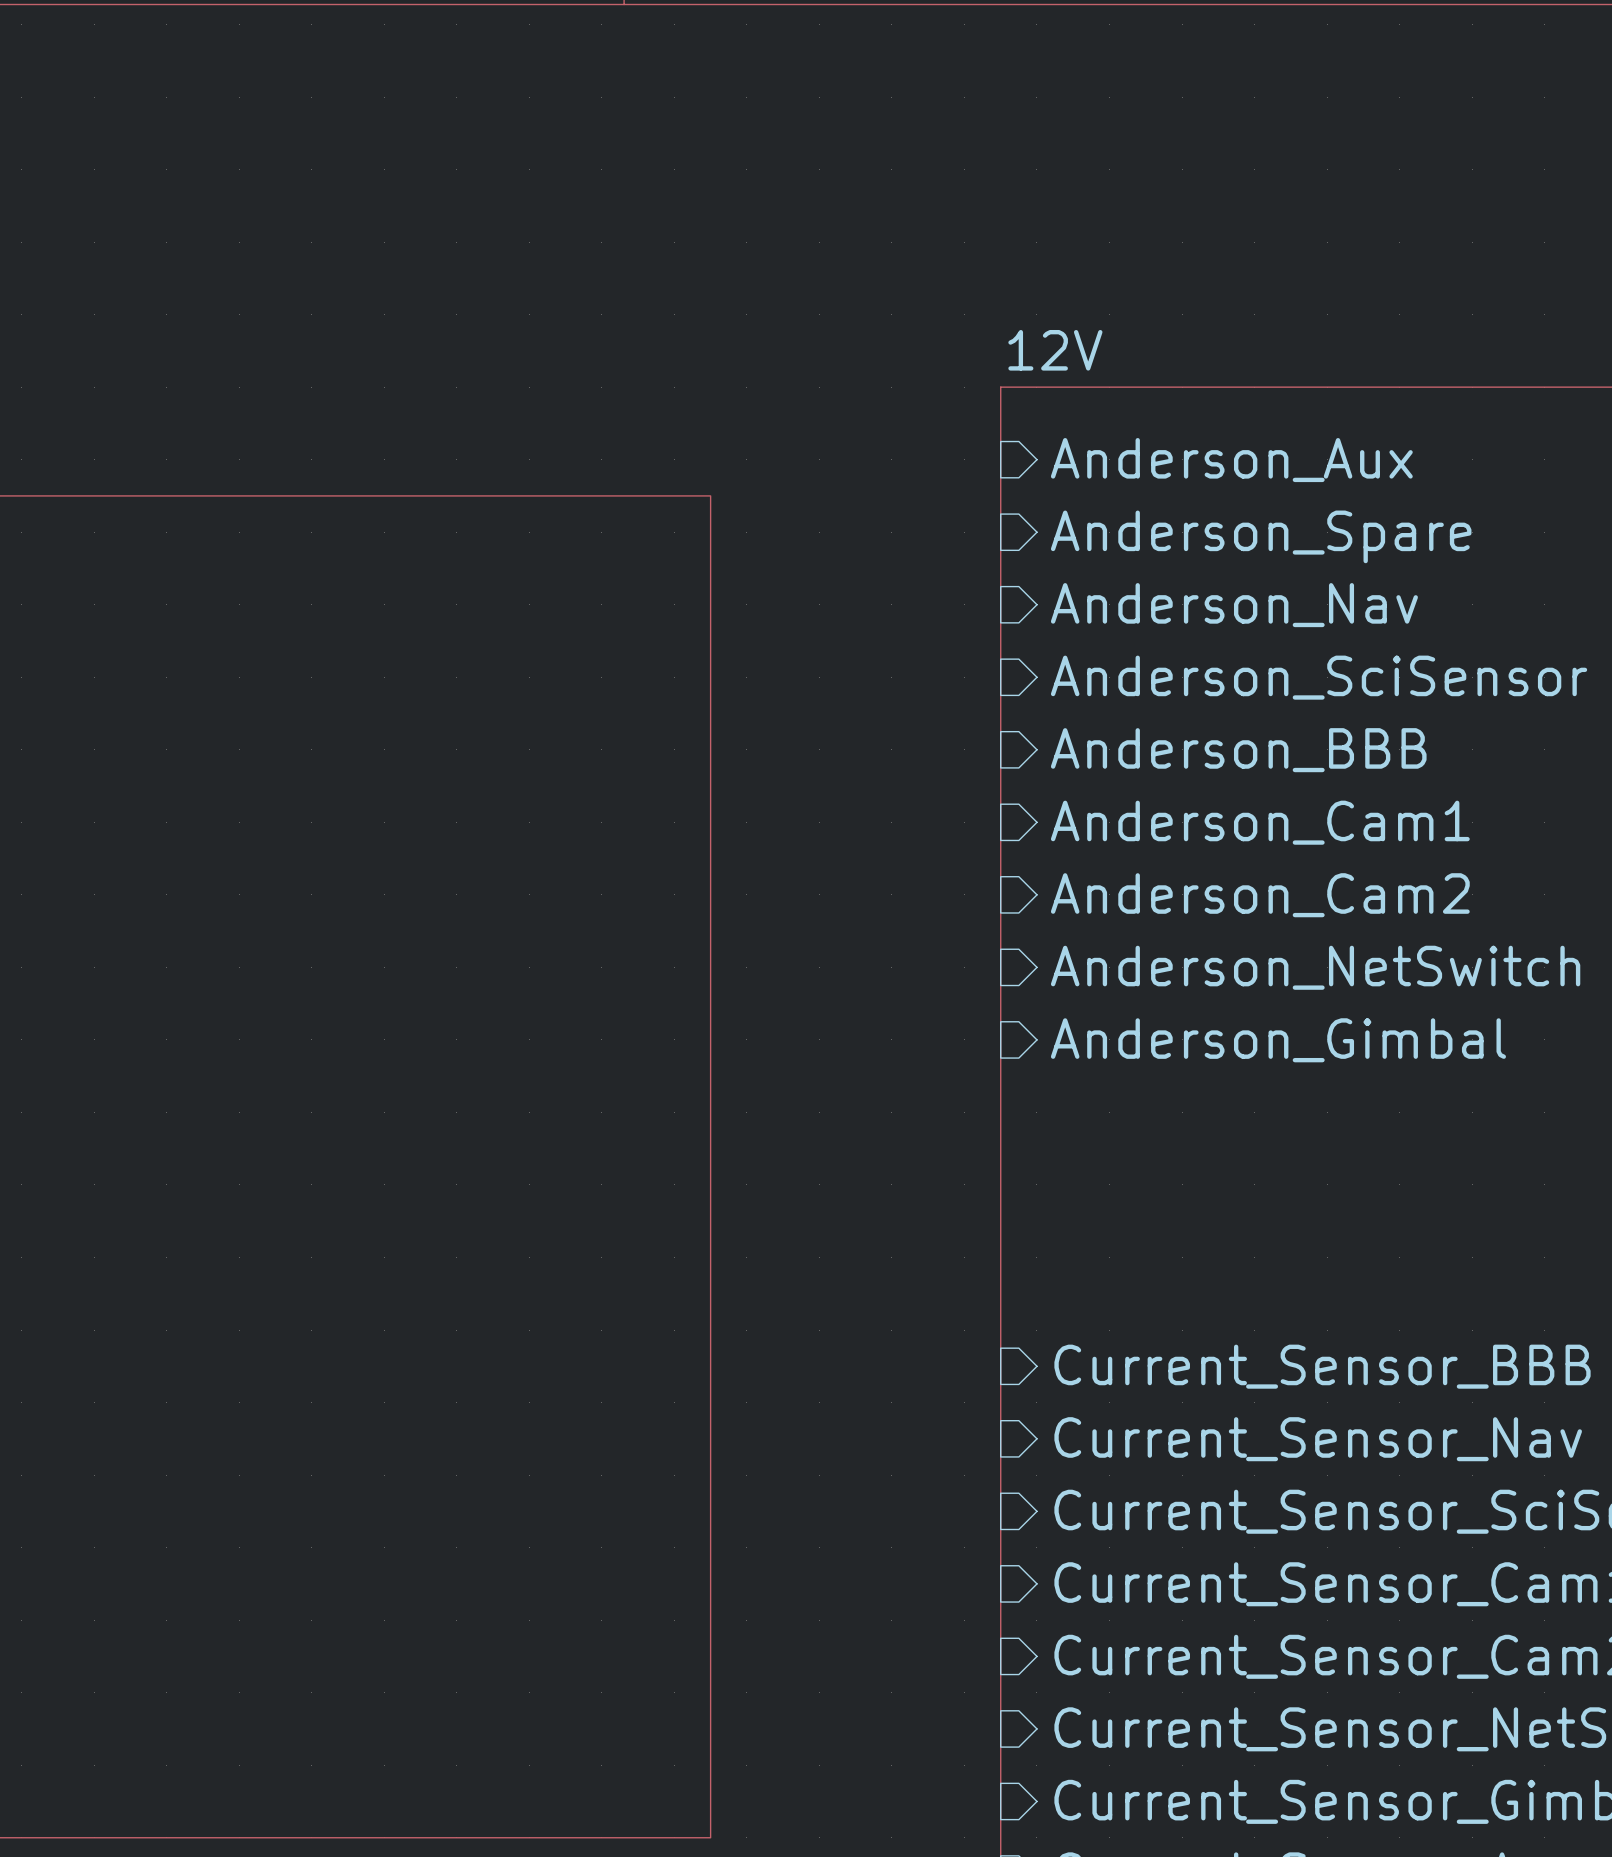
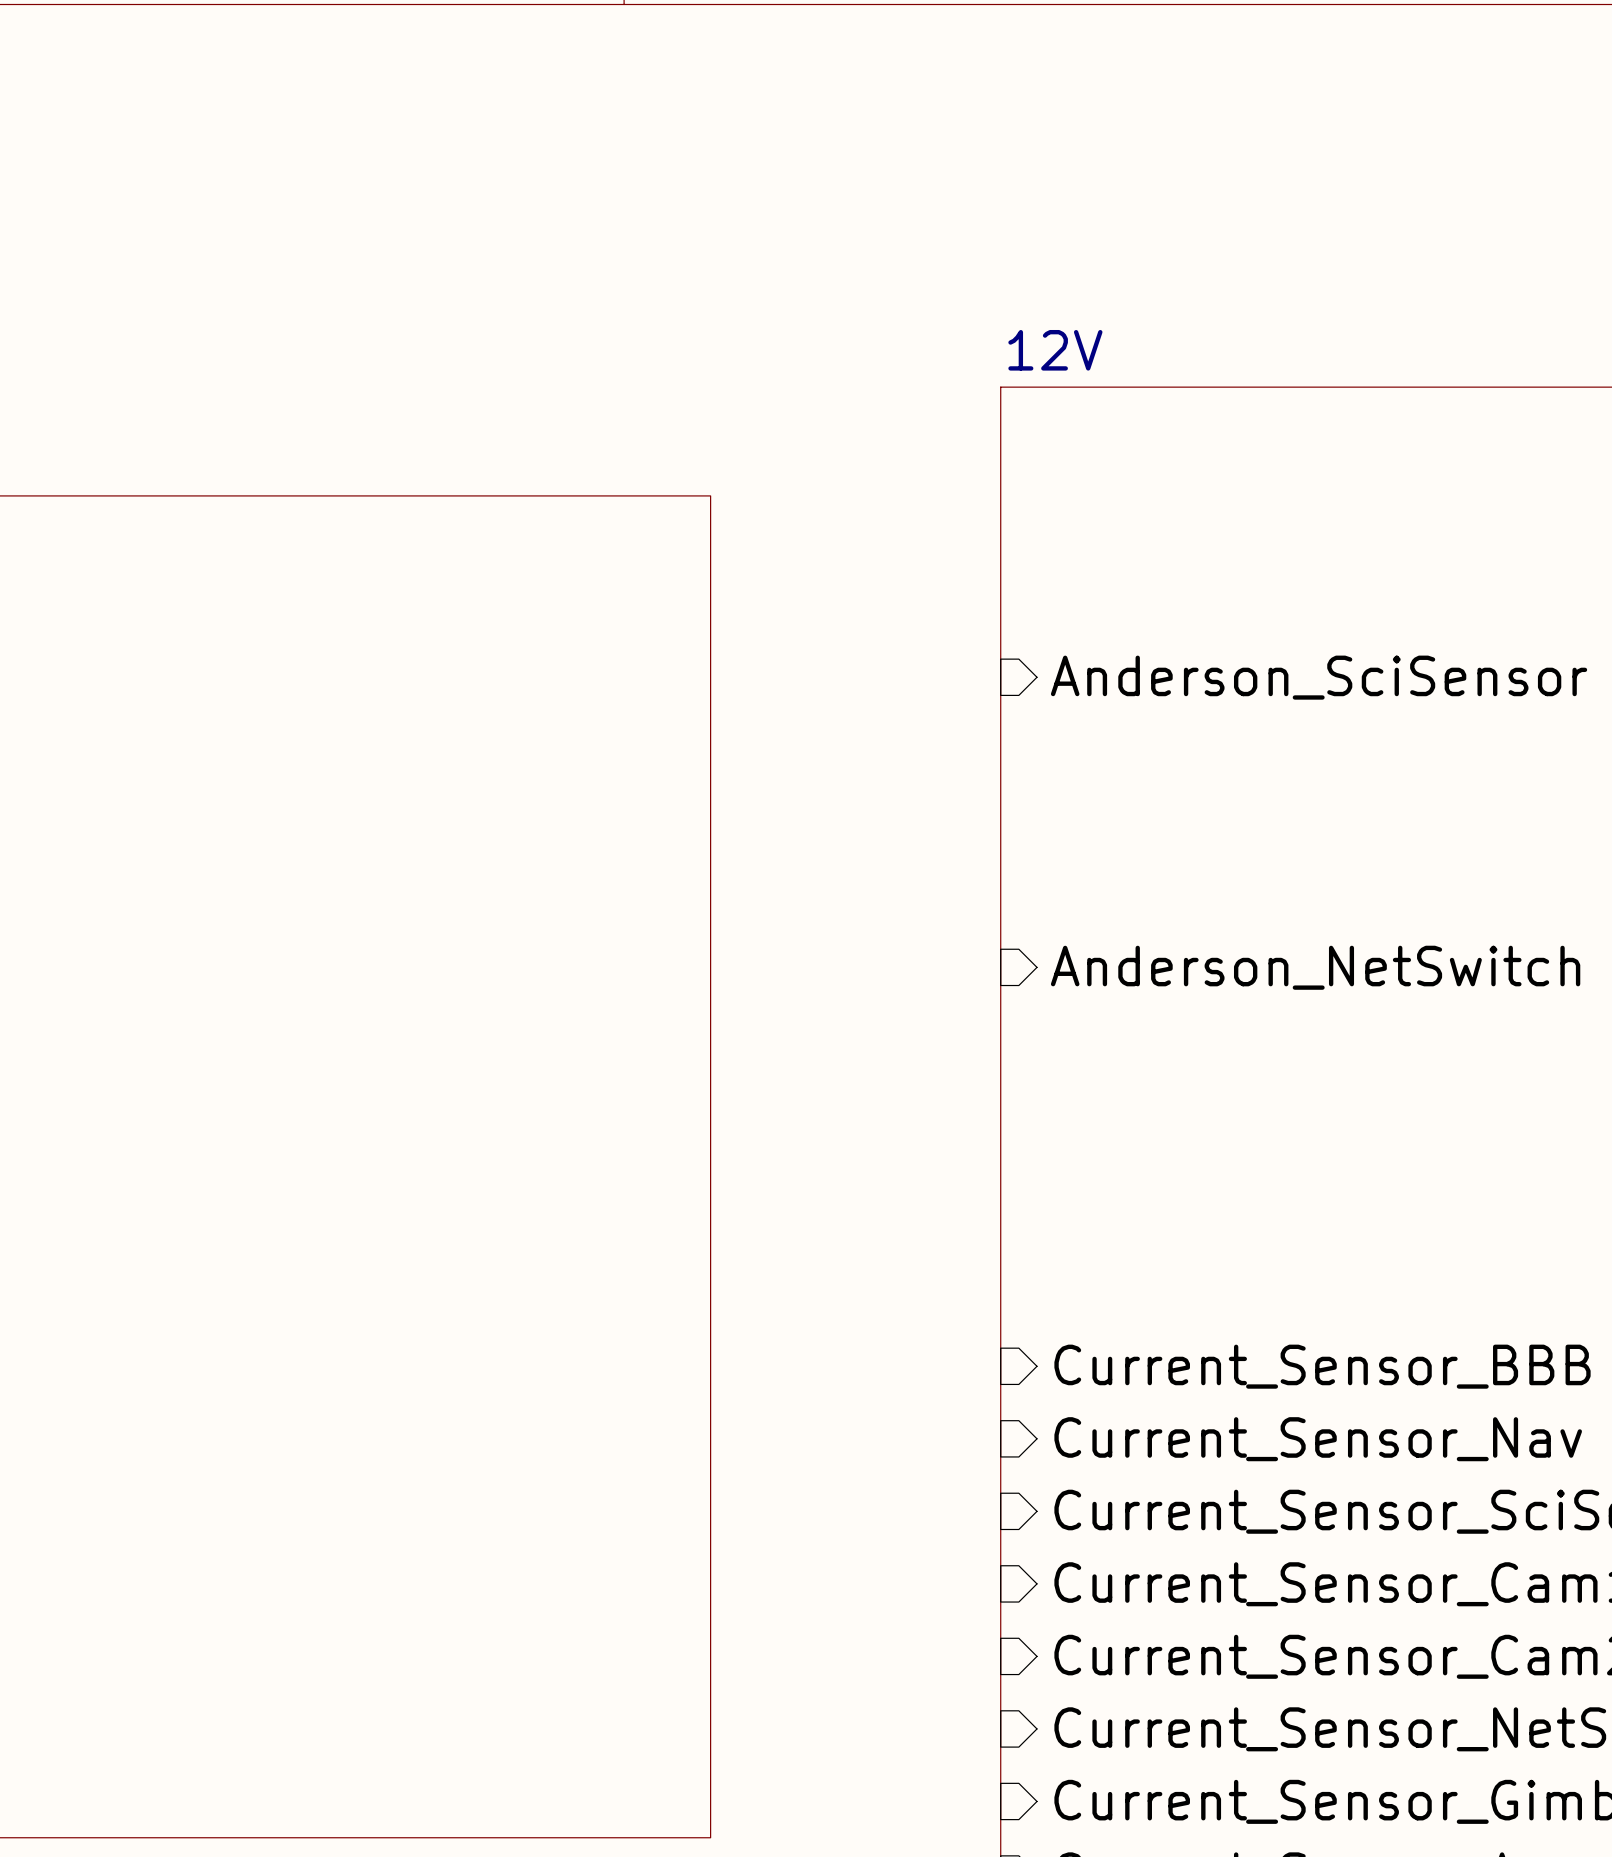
sheet pin: Anderson_Aux (1231, 460) -> none
sheet pin: Anderson_Spare (1261, 536) -> none
sheet pin: Anderson_Nav (1234, 605) -> none
sheet pin: Anderson_BBB (1238, 750) -> none
sheet pin: Anderson_Cam1 (1260, 822) -> none
sheet pin: Anderson_Cam2 (1260, 895) -> none
sheet pin: Anderson_Gimbal (1278, 1040) -> none

